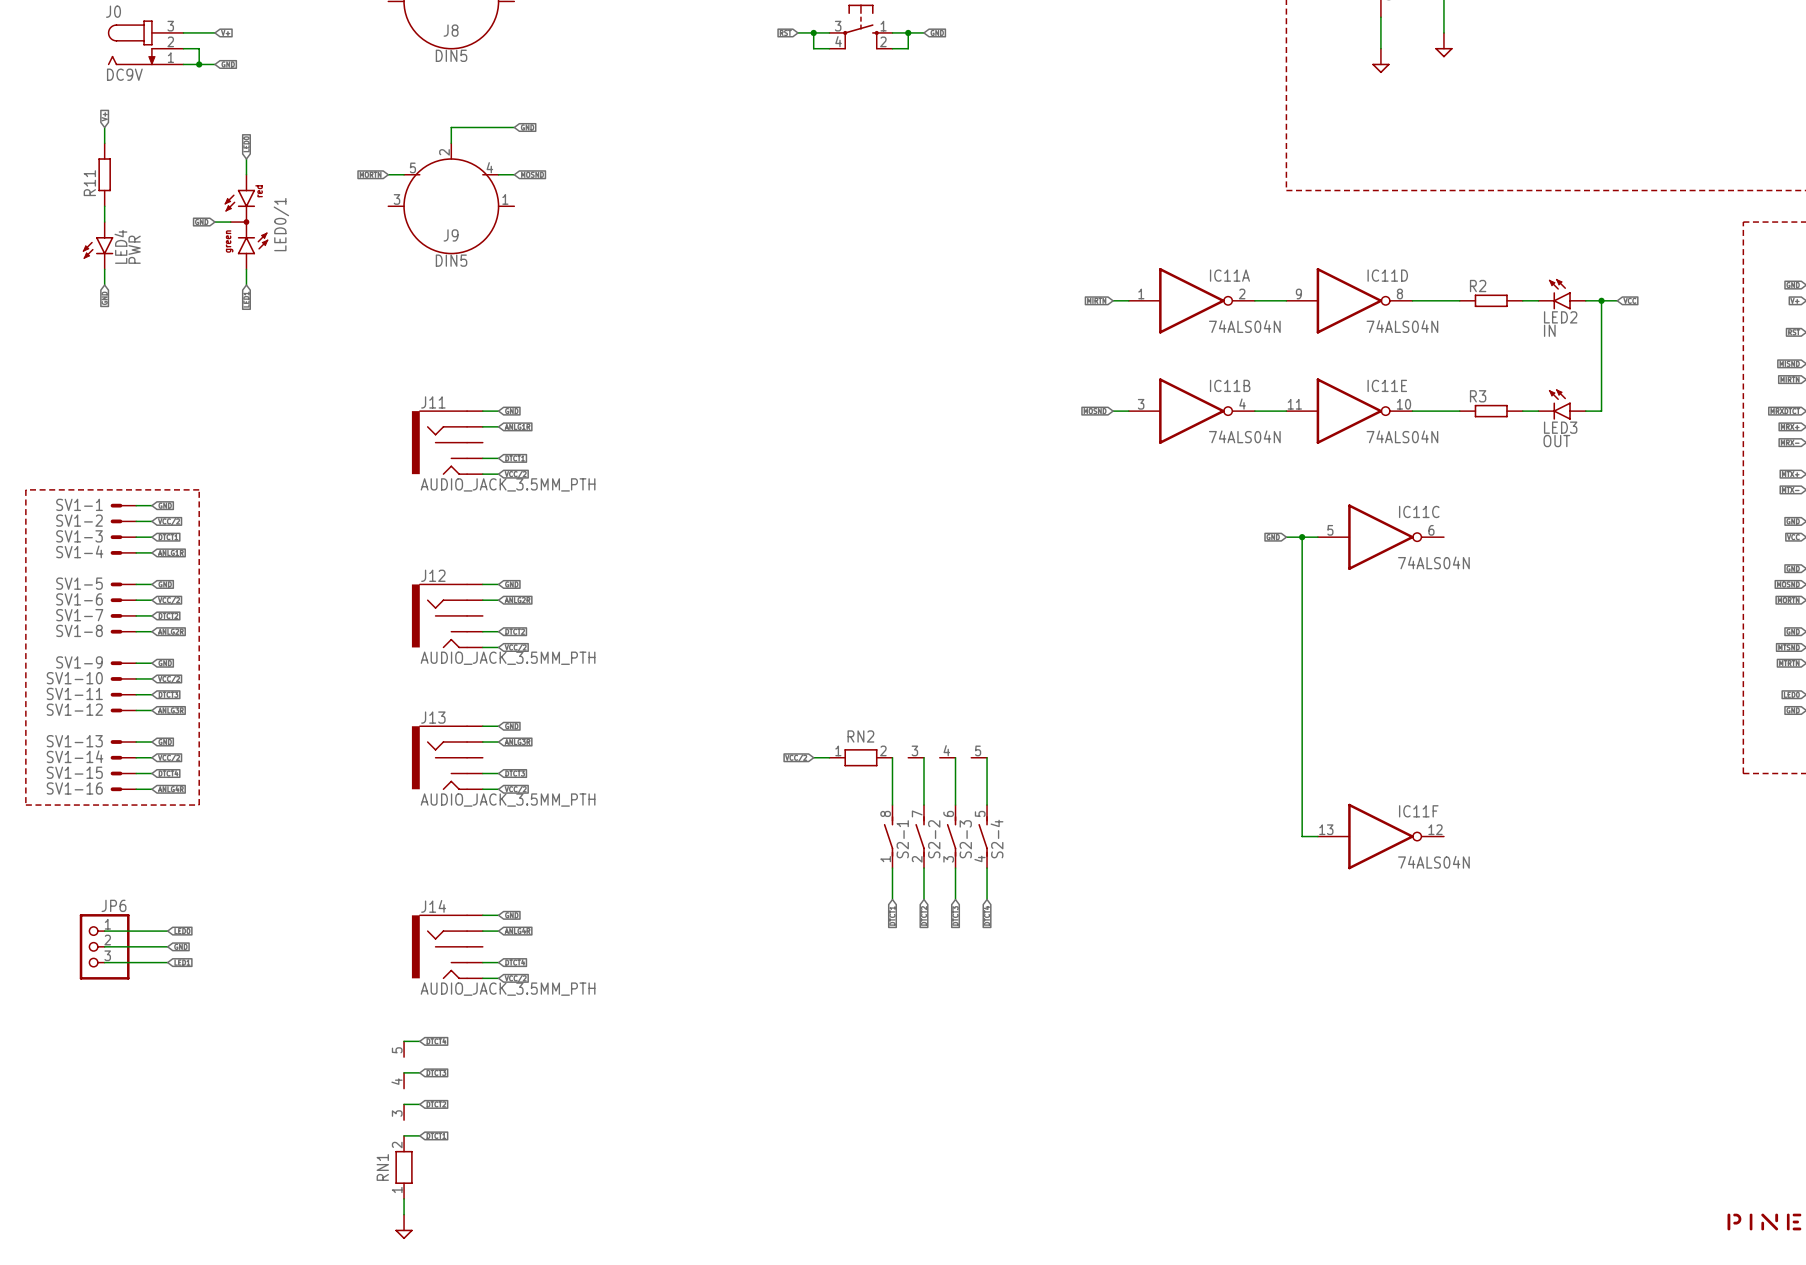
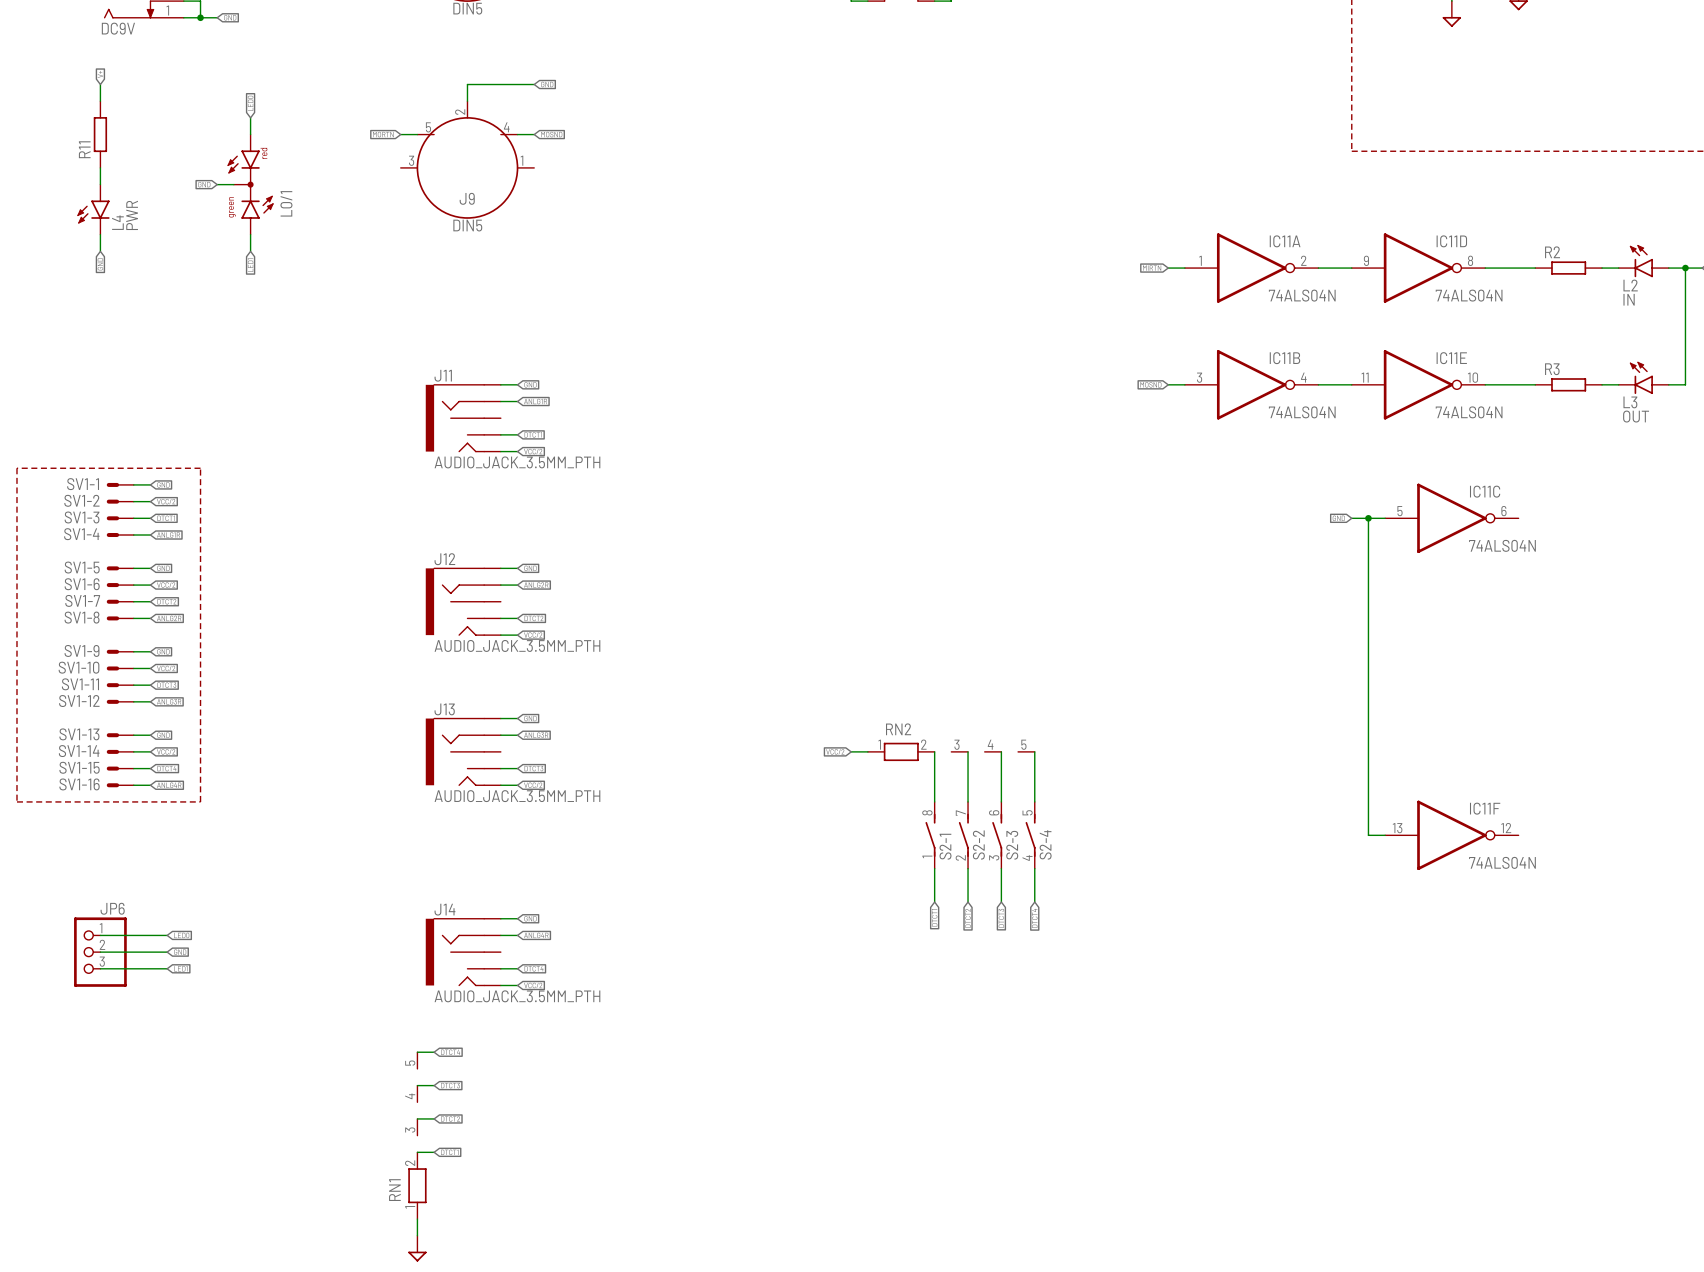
LED0/1 name: LED0/1 (281, 224) -> L0/1 (286, 203)
LED4 name: LED4 (120, 246) -> L4 (117, 222)
LED2 name: LED2 (1560, 317) -> L2 (1630, 285)
LED3 name: LED3 (1560, 427) -> L3 (1630, 402)

